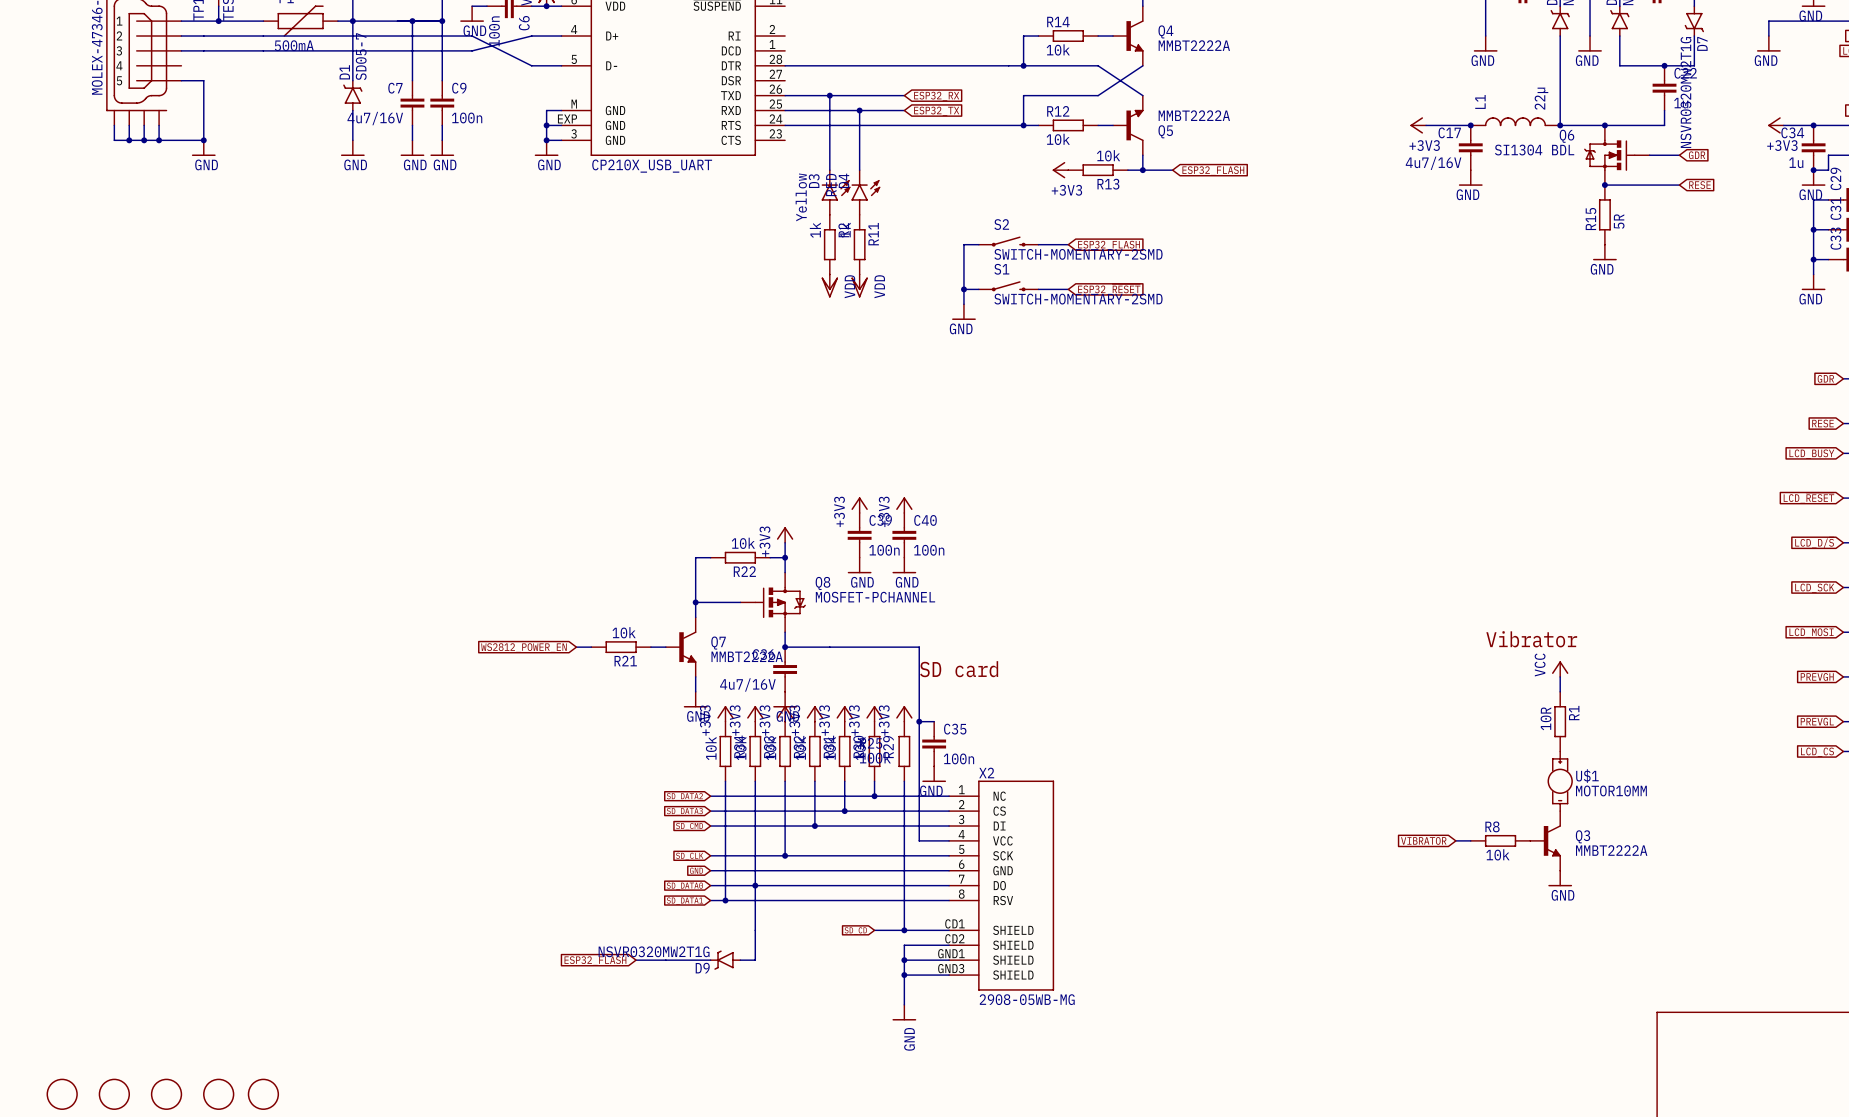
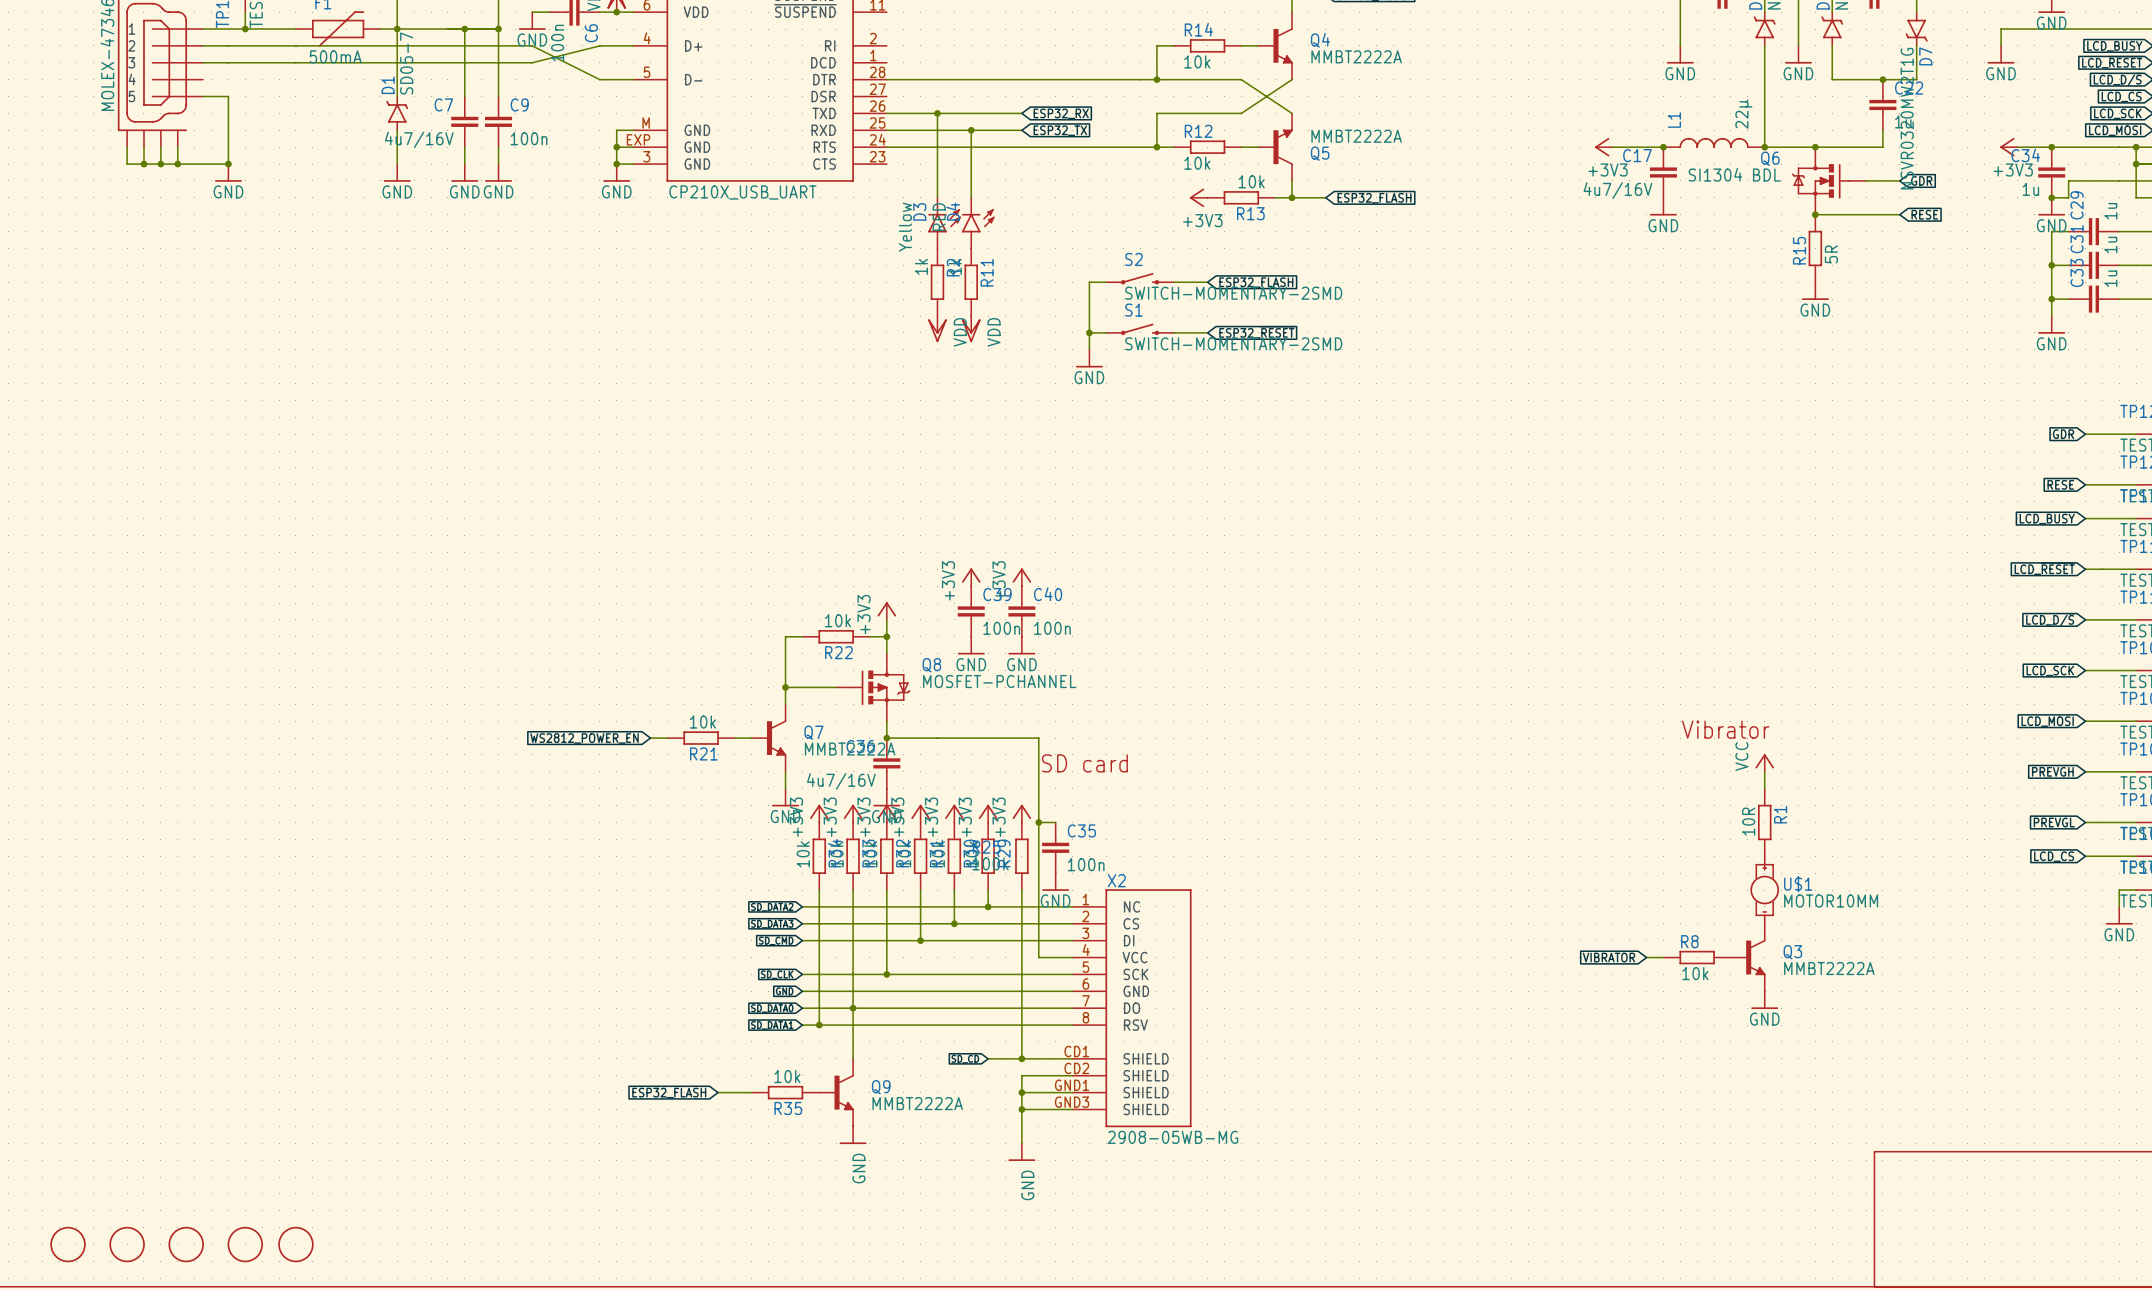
wire: (755, 930) (755, 960) (740, 960) -> none
wire: (665, 960) (710, 960) -> none
R35: none -> 10k (785, 1092)
D9: NSVR0320MW2T1G (725, 960) -> none
Q9: none -> MMBT2222A (836, 1092)
power symbol: none -> GND (853, 1135)

